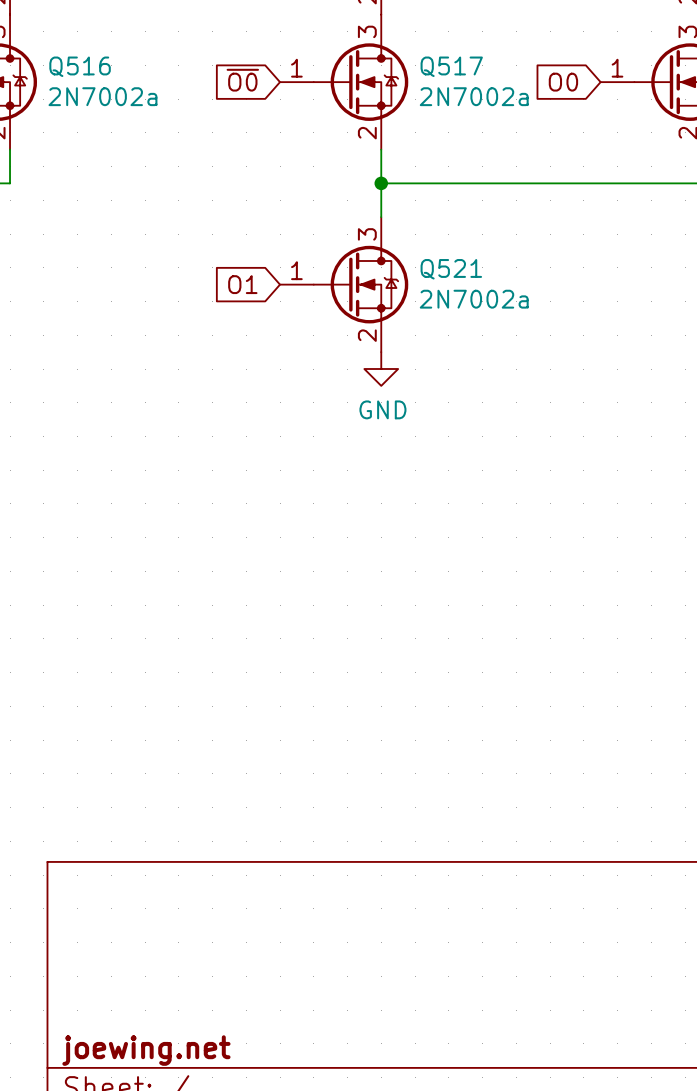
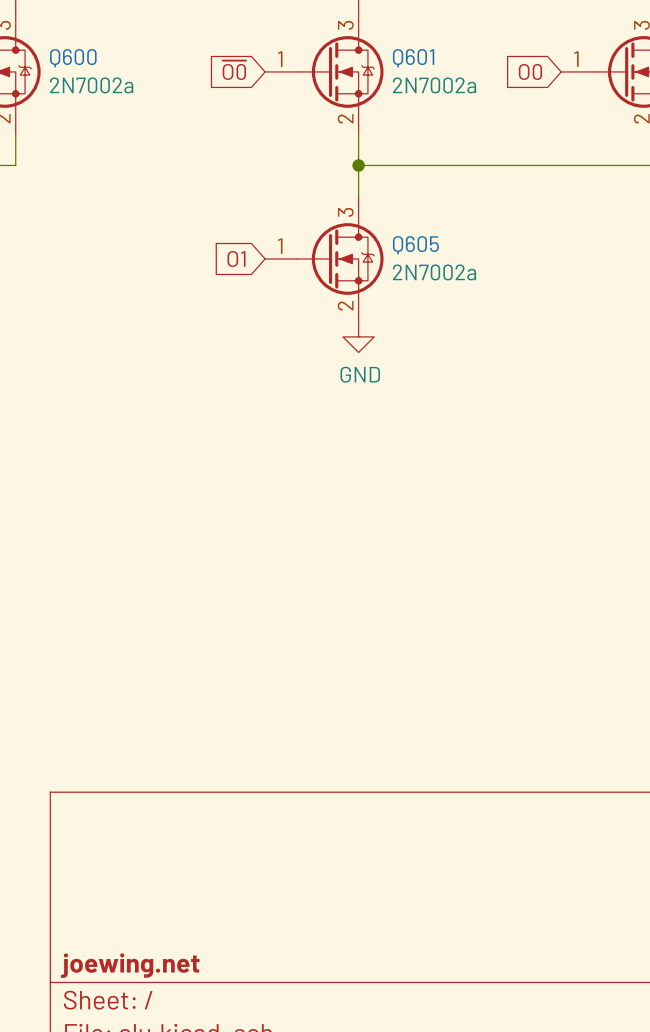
Q516 name: Q516 (80, 66) -> Q600 (73, 58)
Q517 name: Q517 (451, 66) -> Q601 (413, 58)
Q521 name: Q521 (451, 269) -> Q605 (415, 245)

